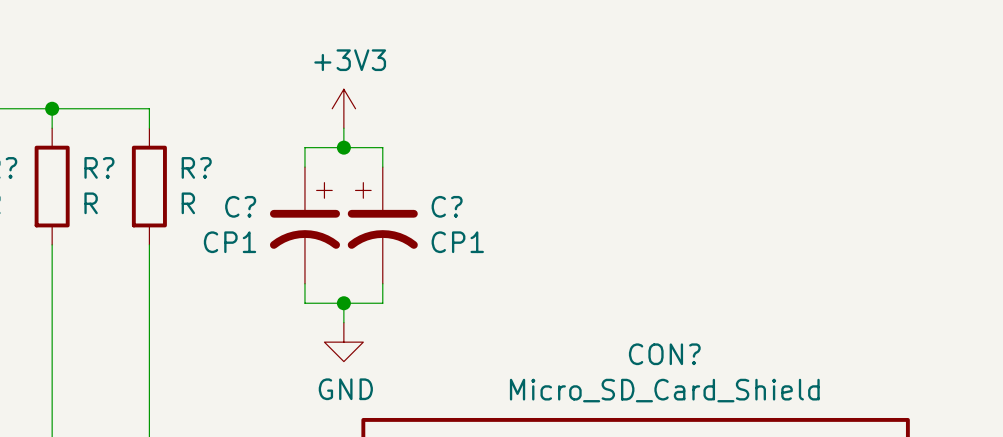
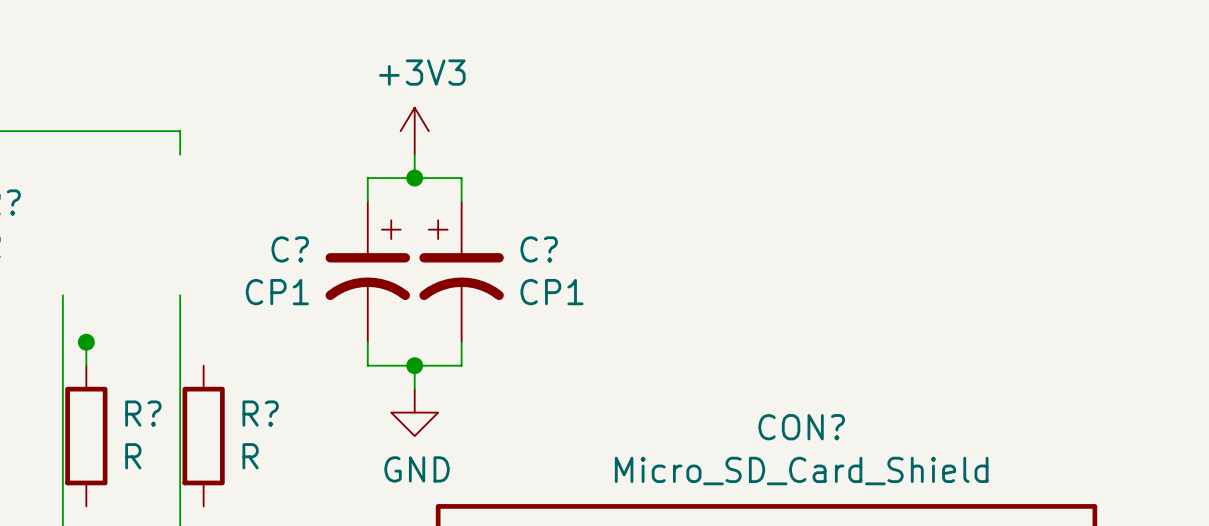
wire: (52, 108) (52, 128) -> (86, 342) (86, 365)
junction: (52, 108) -> none
R?: R (52, 186) -> none
R?: R (149, 186) -> none
junction: none -> (86, 342)
R?: none -> R (86, 436)
R?: none -> R (203, 436)

